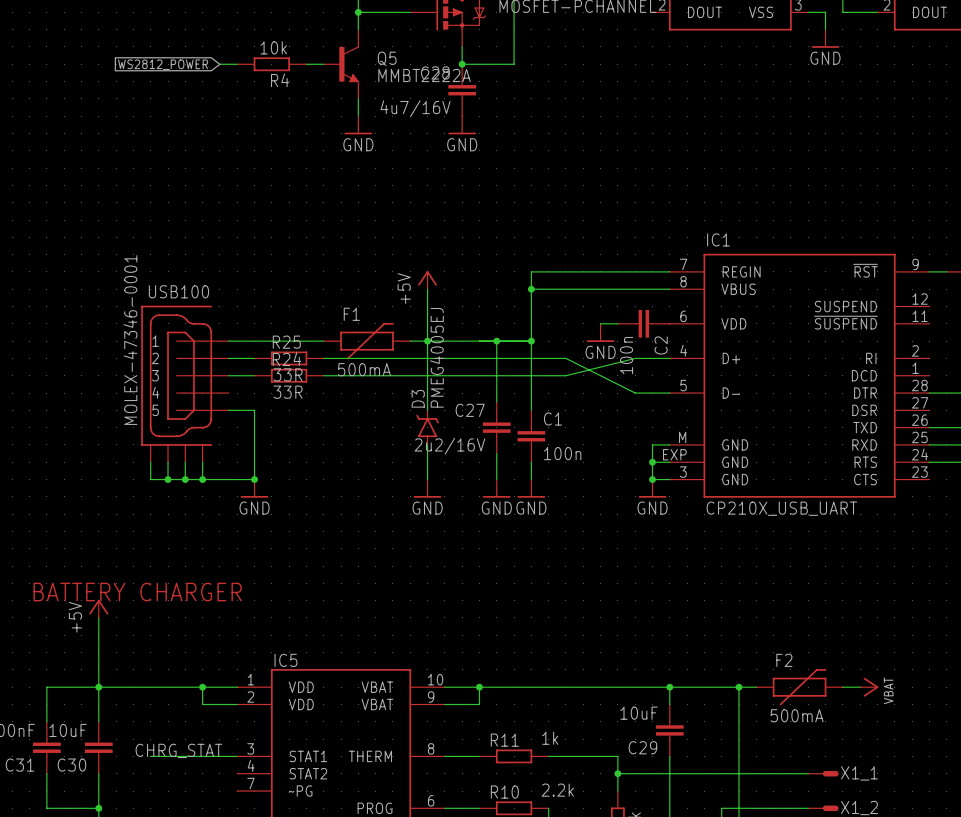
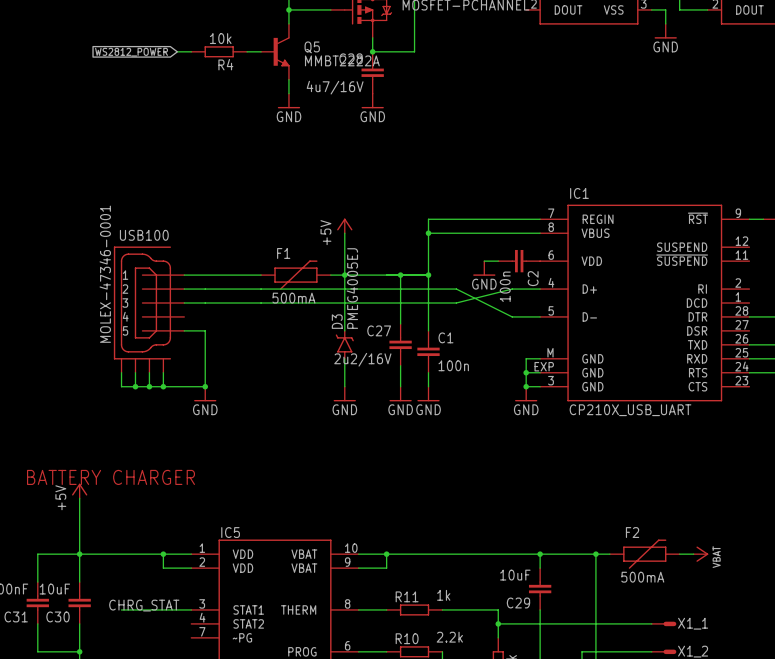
R25: 33R (289, 358) -> none
R24: 33R (289, 375) -> none

